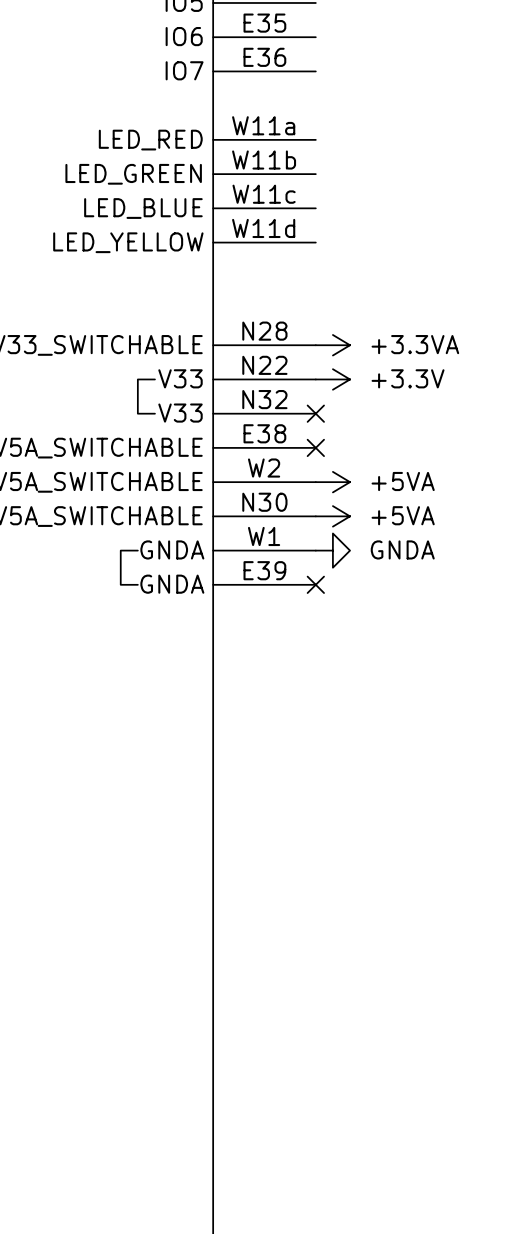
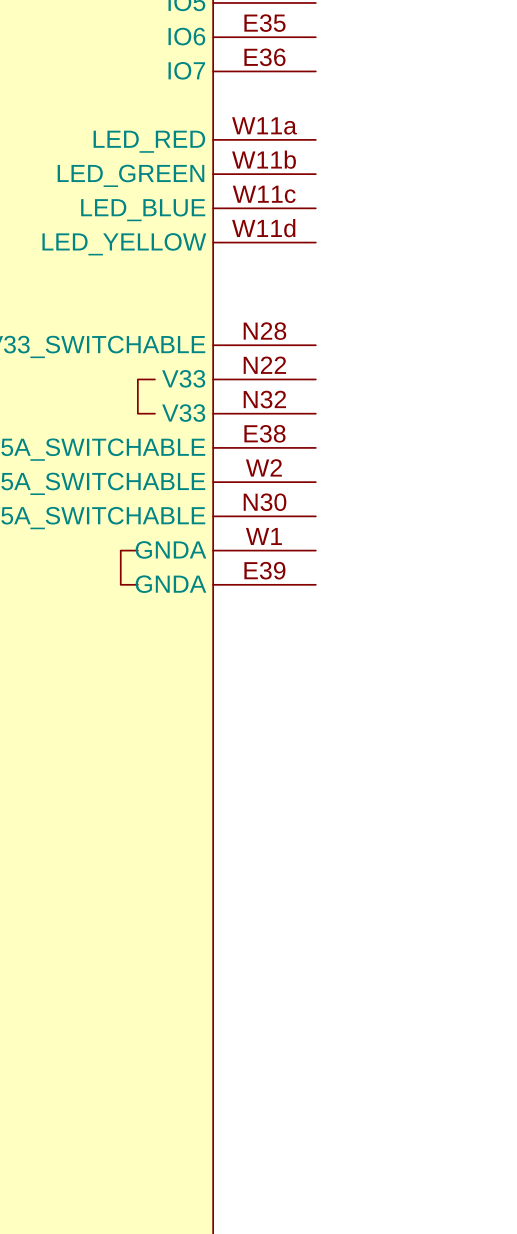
power symbol: +3.3VA (332, 345) -> none
power symbol: +3.3V (332, 379) -> none
no-connect mark: (315, 413) -> none
no-connect mark: (315, 447) -> none
power symbol: +5VA (332, 482) -> none
power symbol: +5VA (332, 516) -> none
power symbol: GNDA (332, 550) -> none
no-connect mark: (315, 584) -> none

